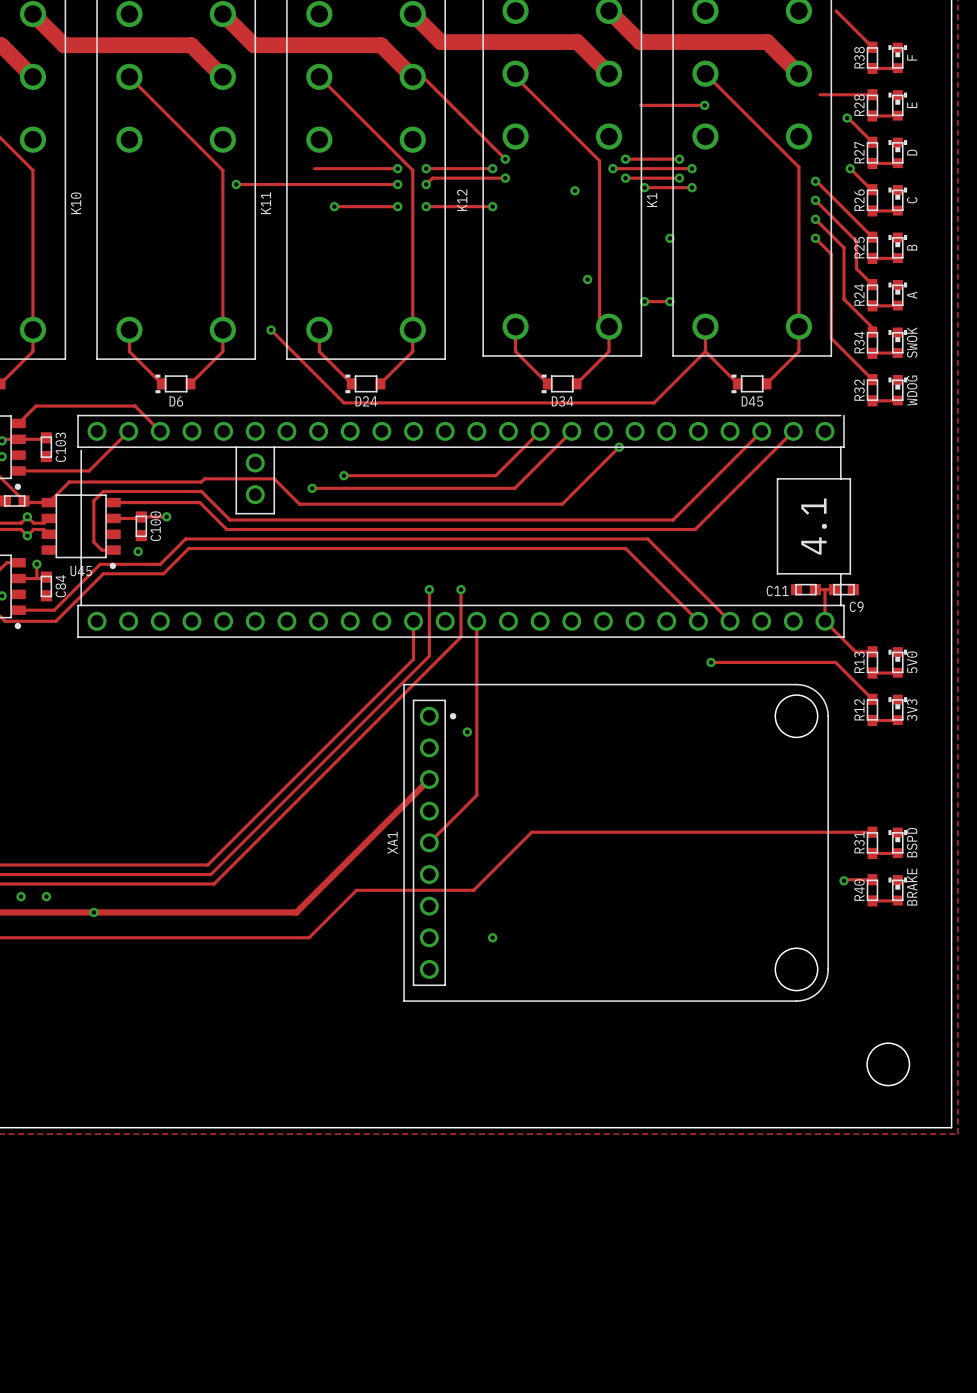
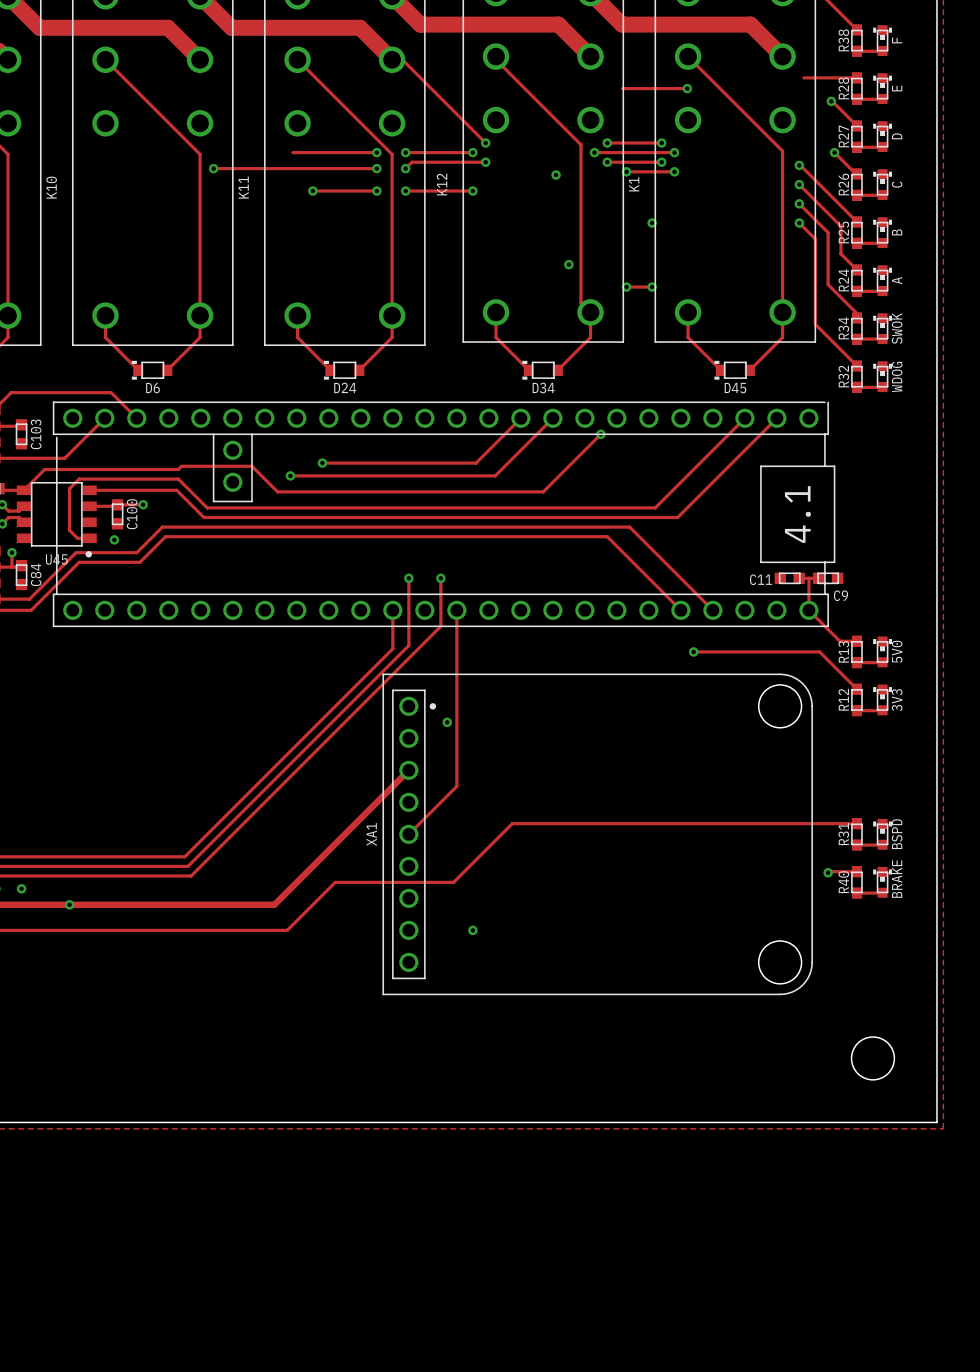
track: (271, 330) (343, 402) (654, 402) (705, 351) -> none
via: (271, 330) -> none

